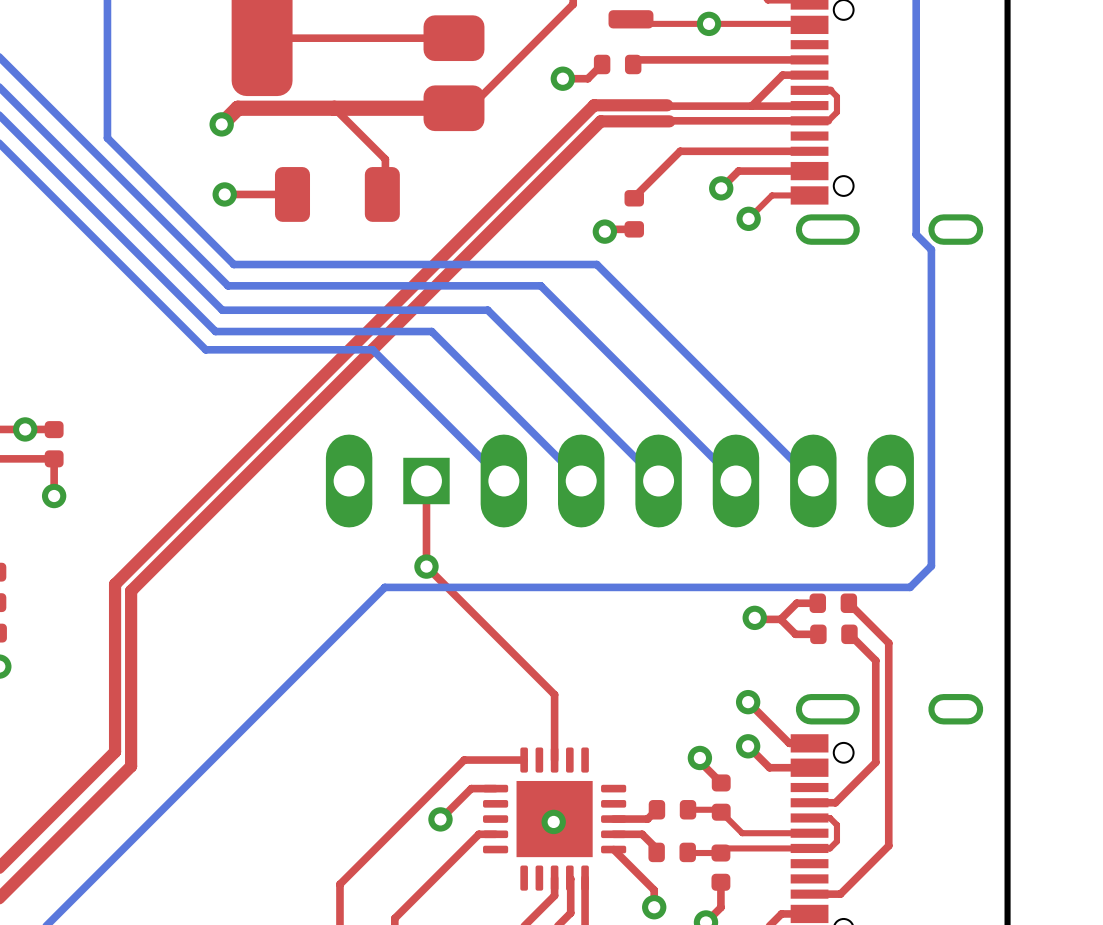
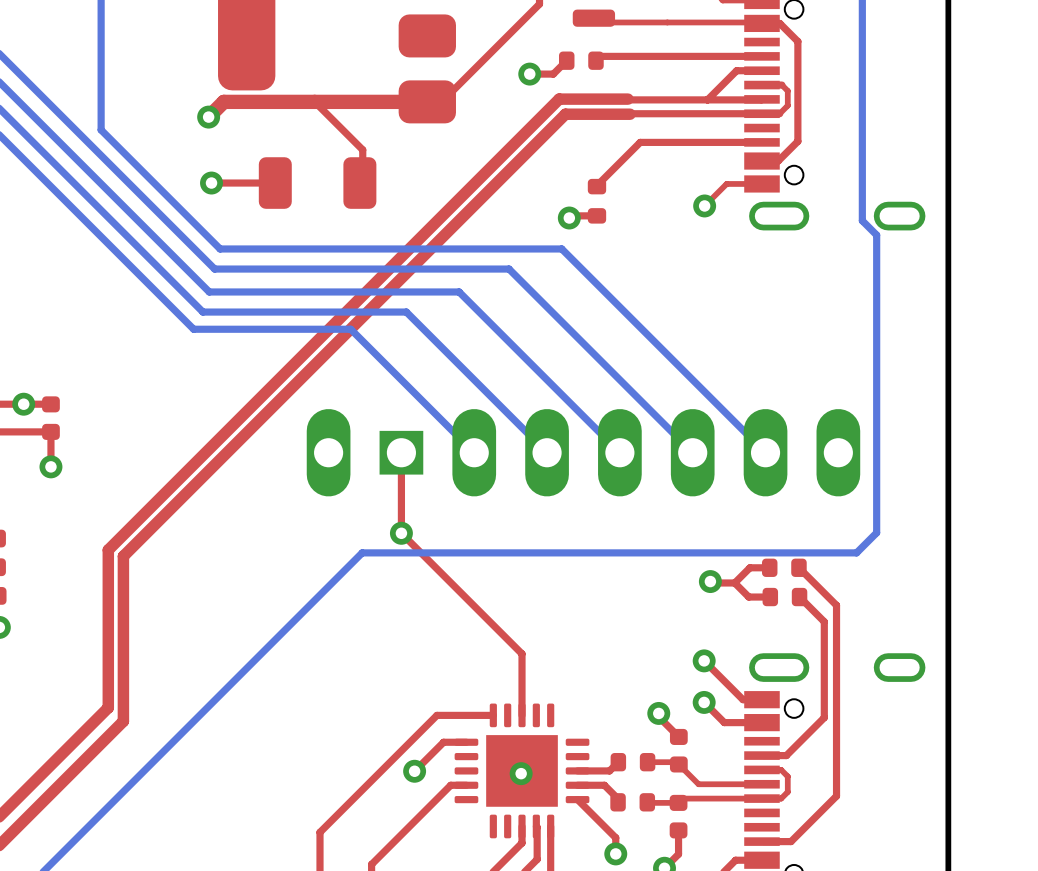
via: (709, 23) -> none
top track: (453, 38) (262, 38) -> none
top track: (809, 171) (738, 171) (721, 188) -> (761, 161) (778, 161) (797, 141) (797, 41) (779, 23) (761, 23)
via: (721, 188) -> none

